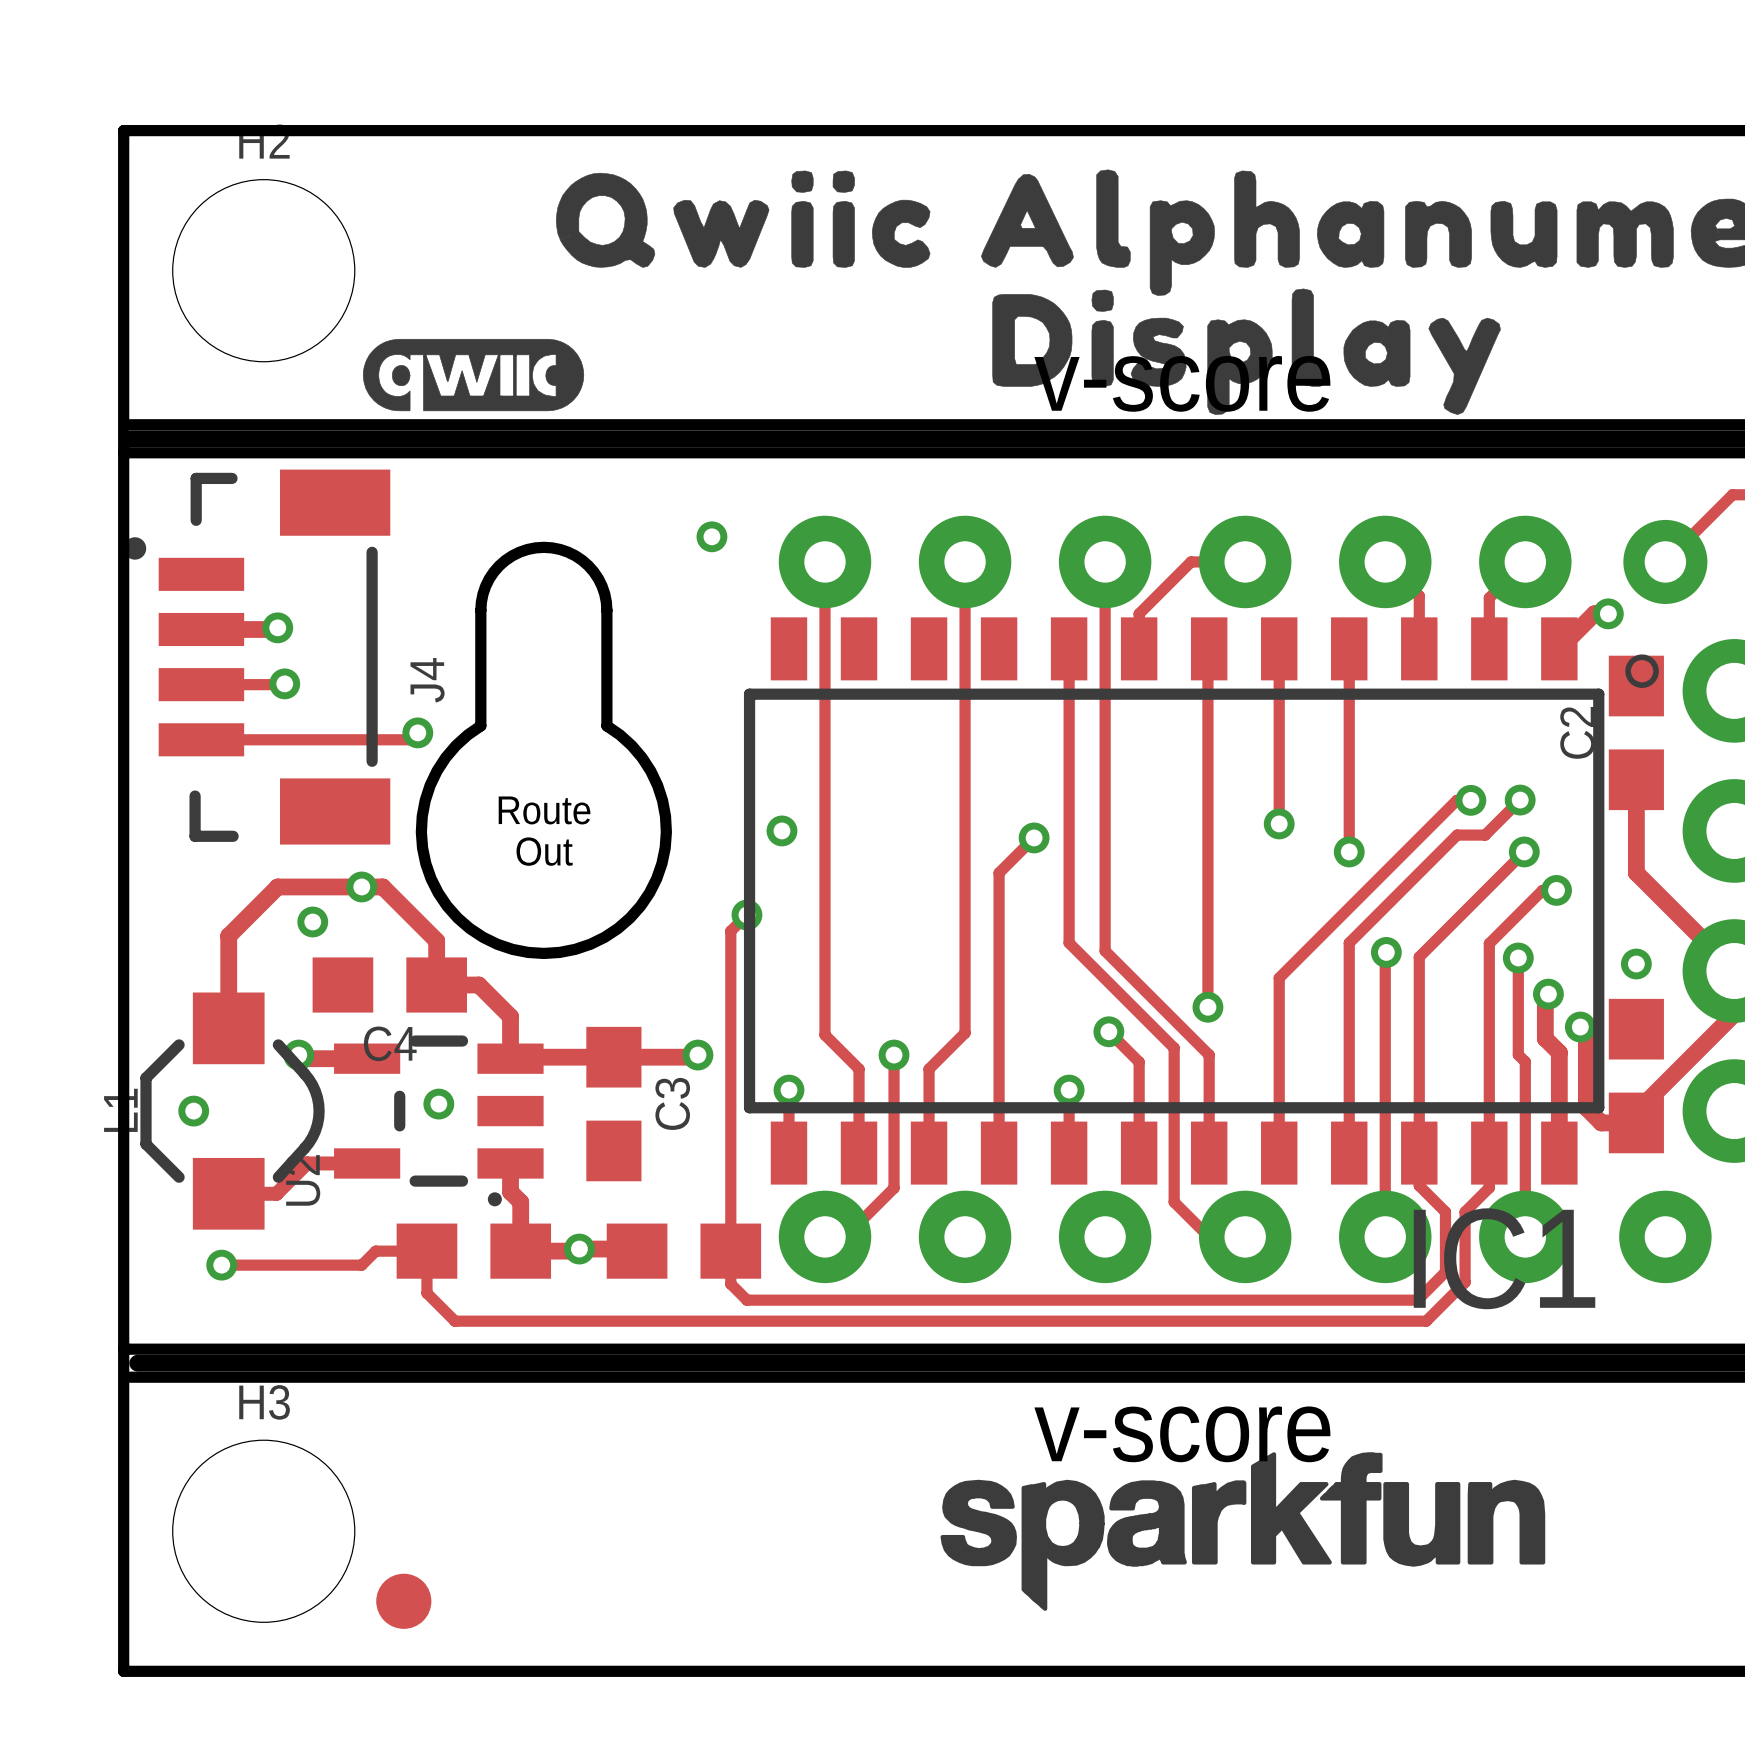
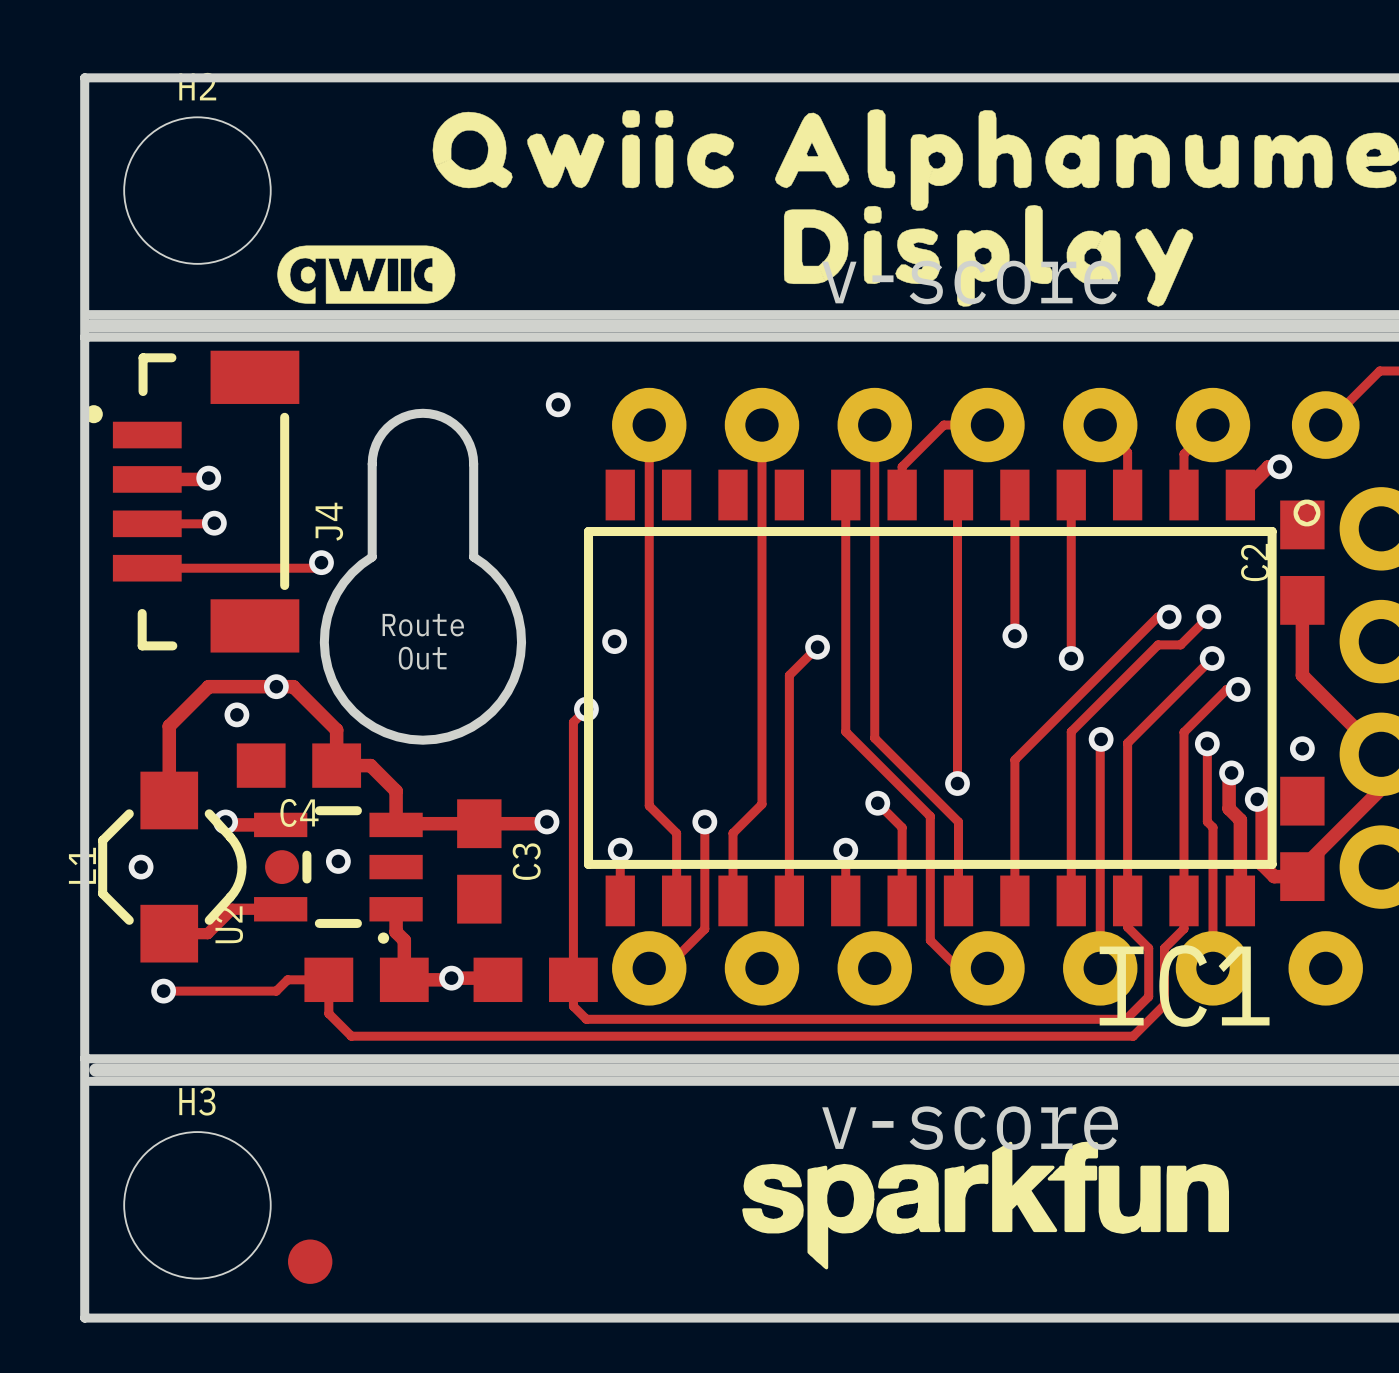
part: none -> (282, 867)

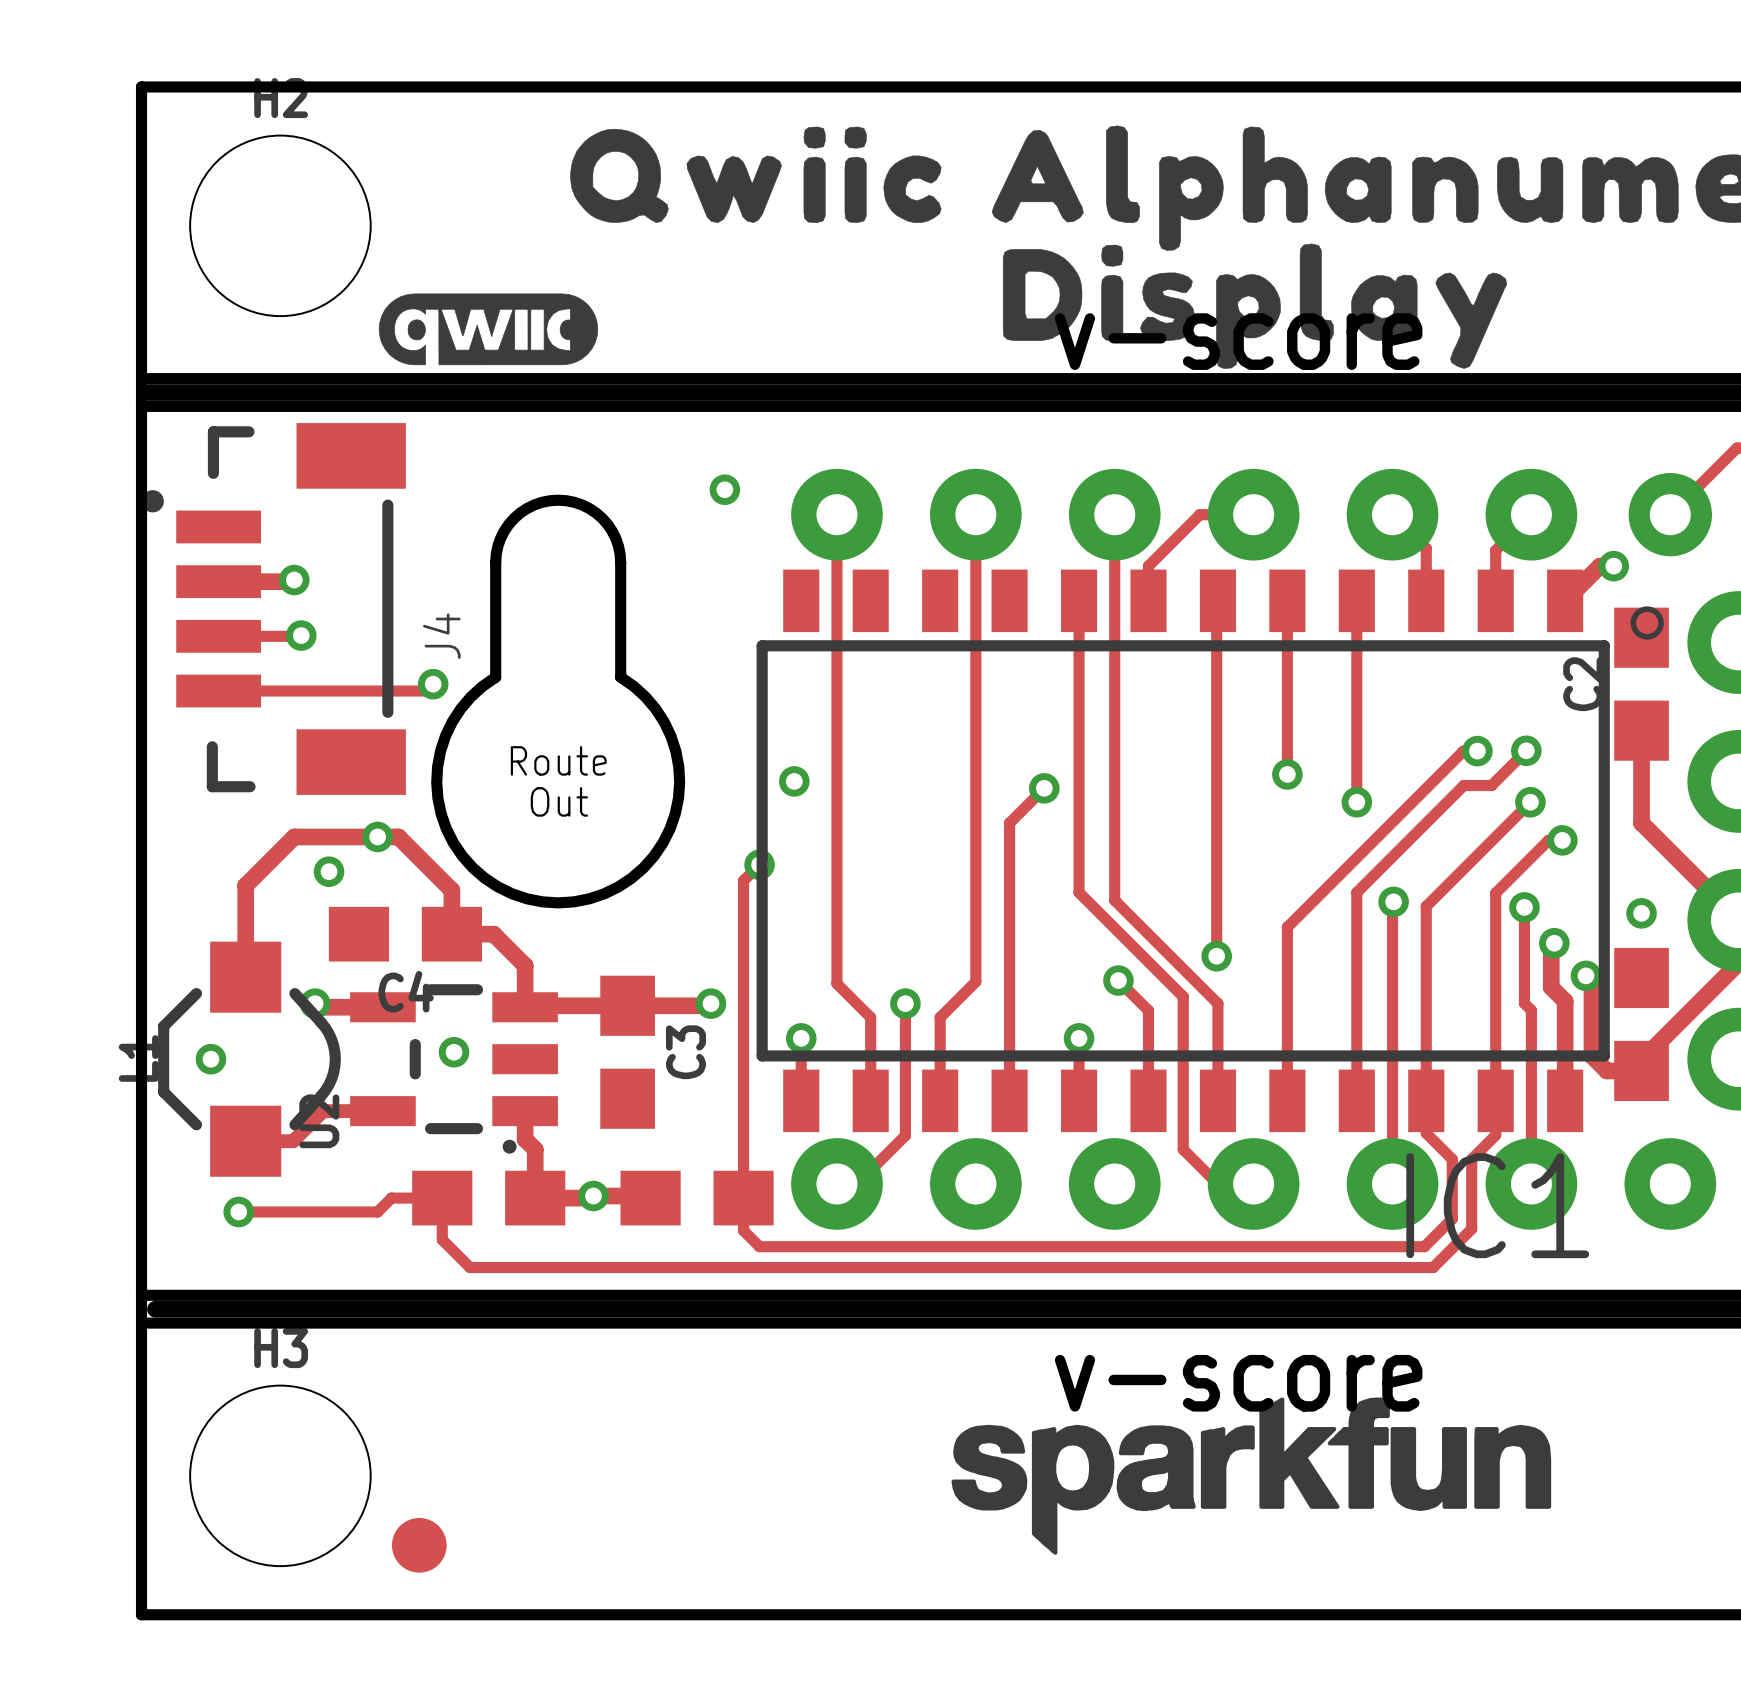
part: (282, 867) -> none

